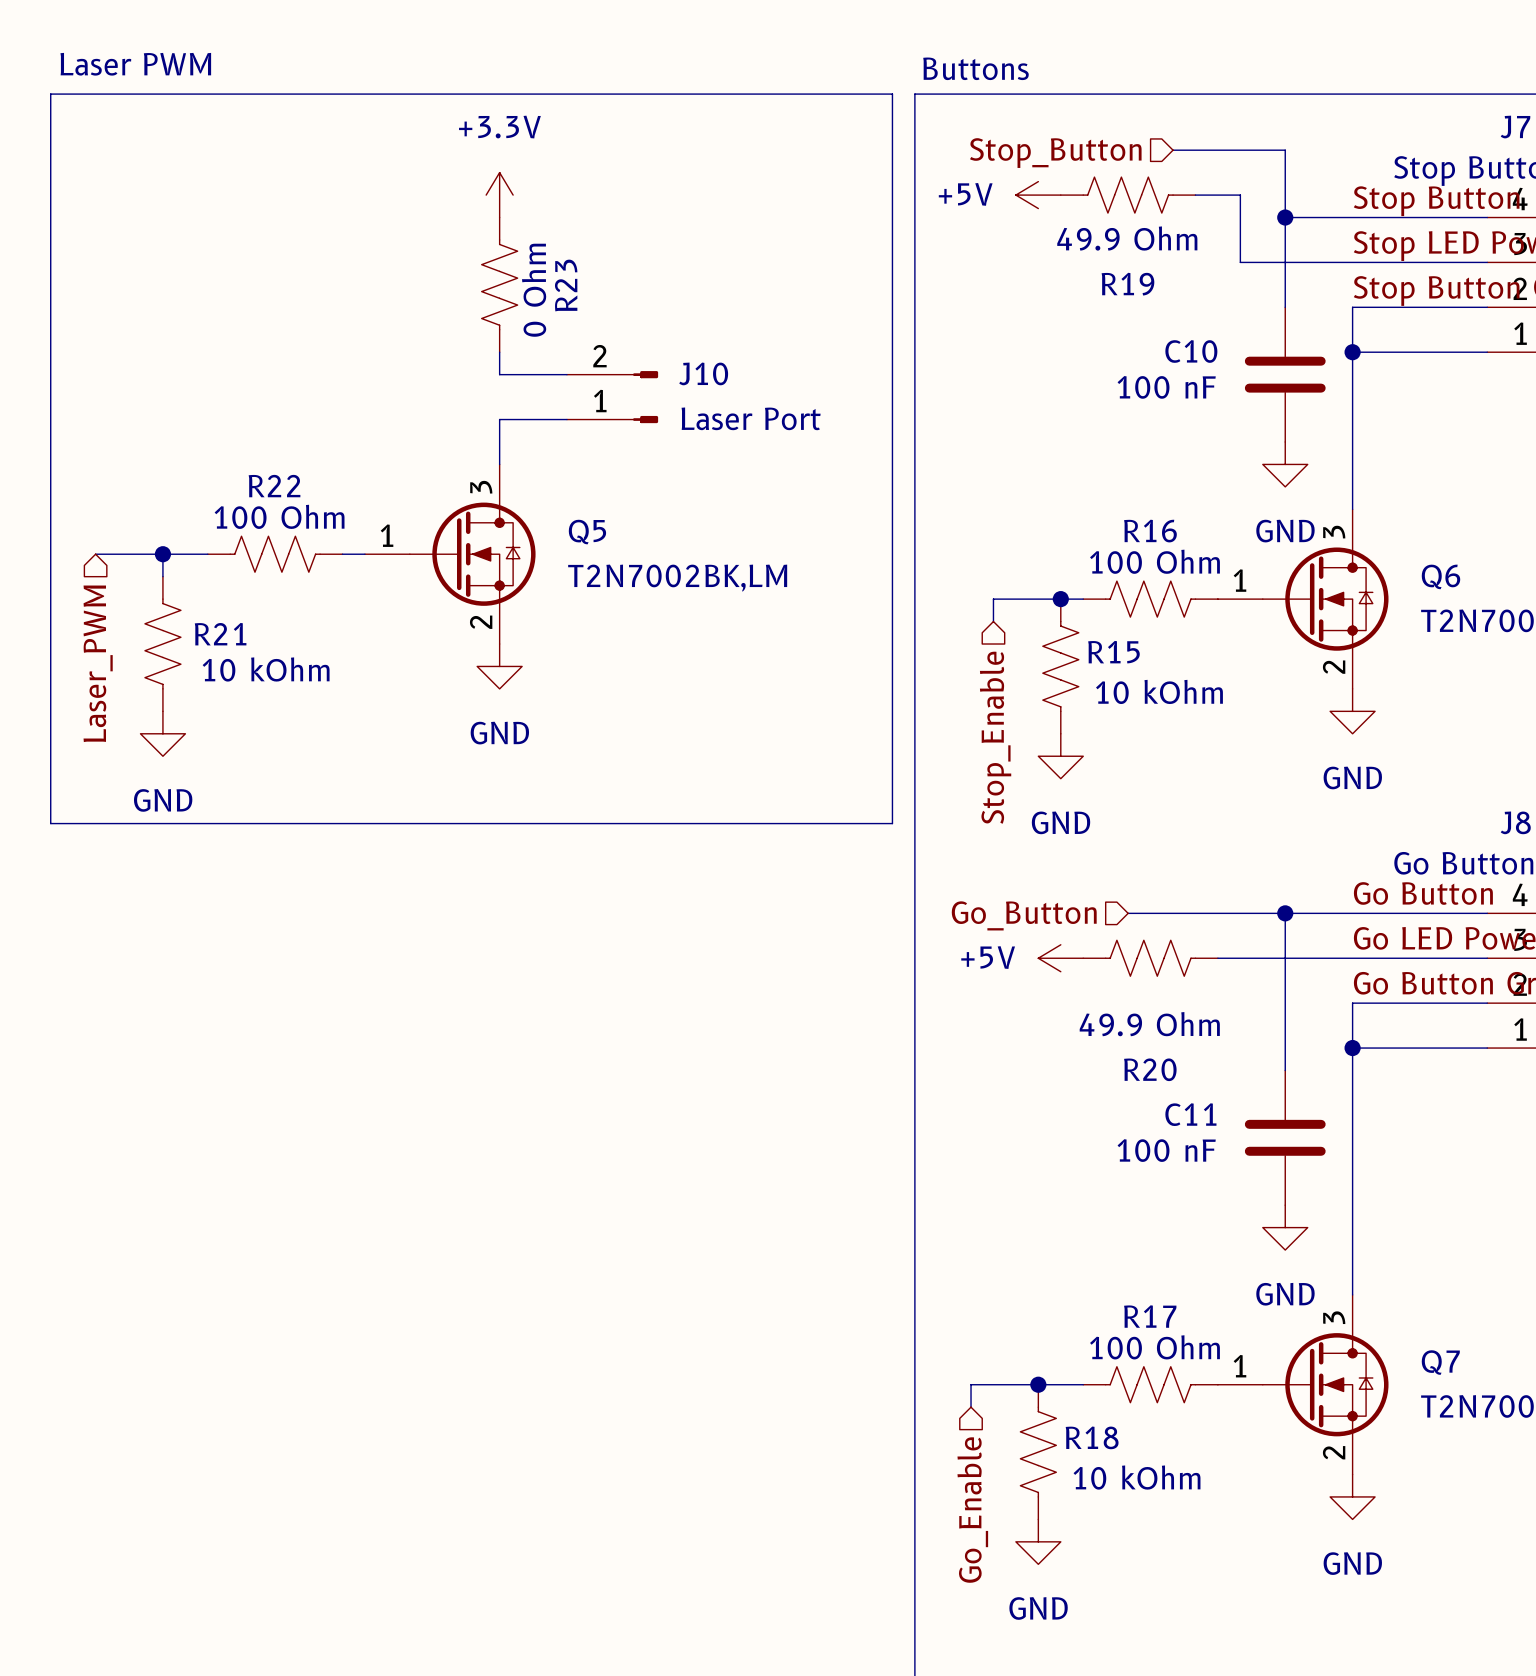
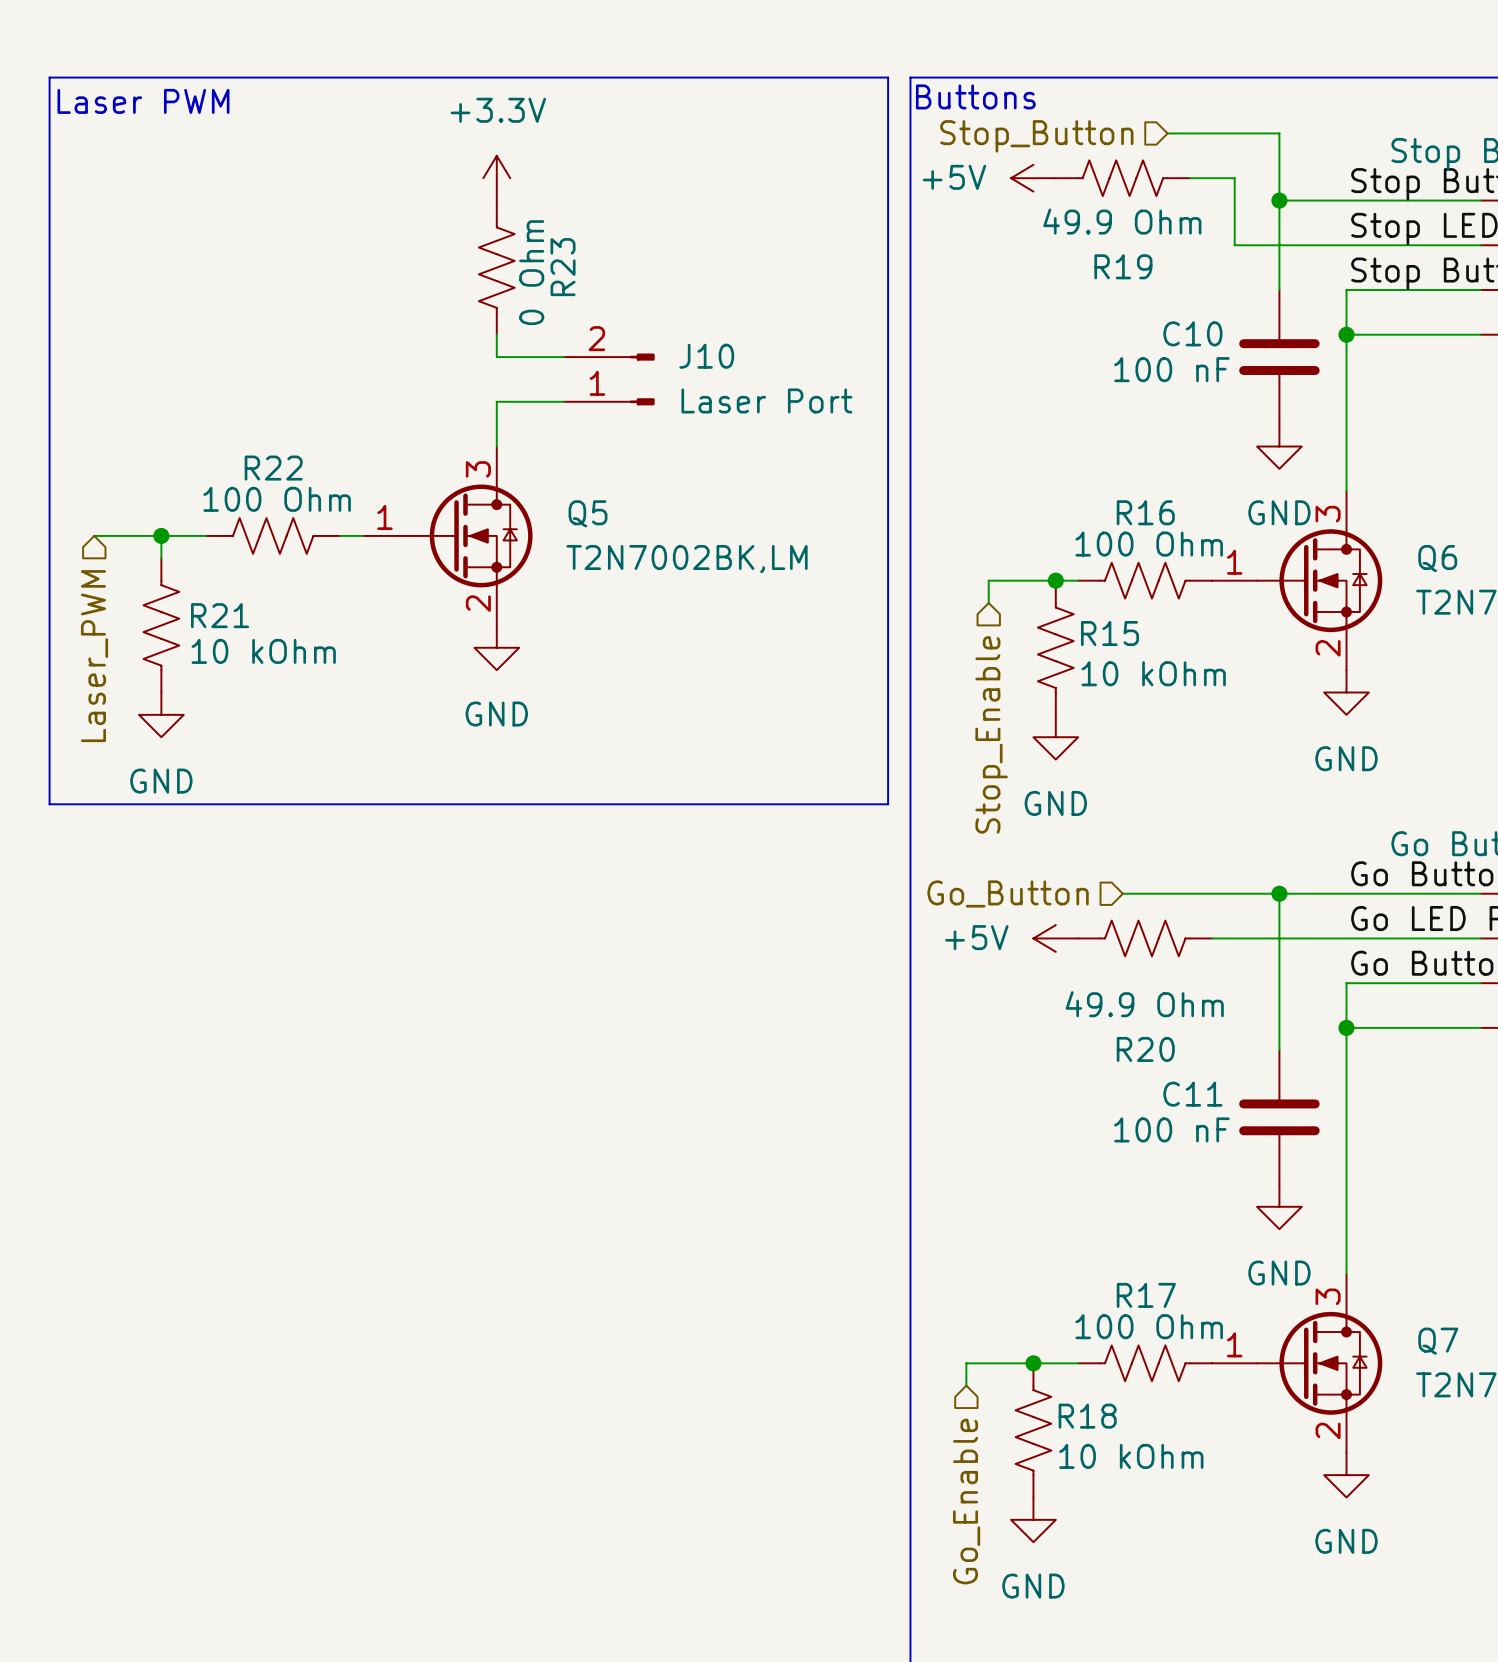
text position: Laser PWM (135, 64) -> Laser PWM (143, 101)
text position: Buttons (975, 68) -> Buttons (975, 96)

